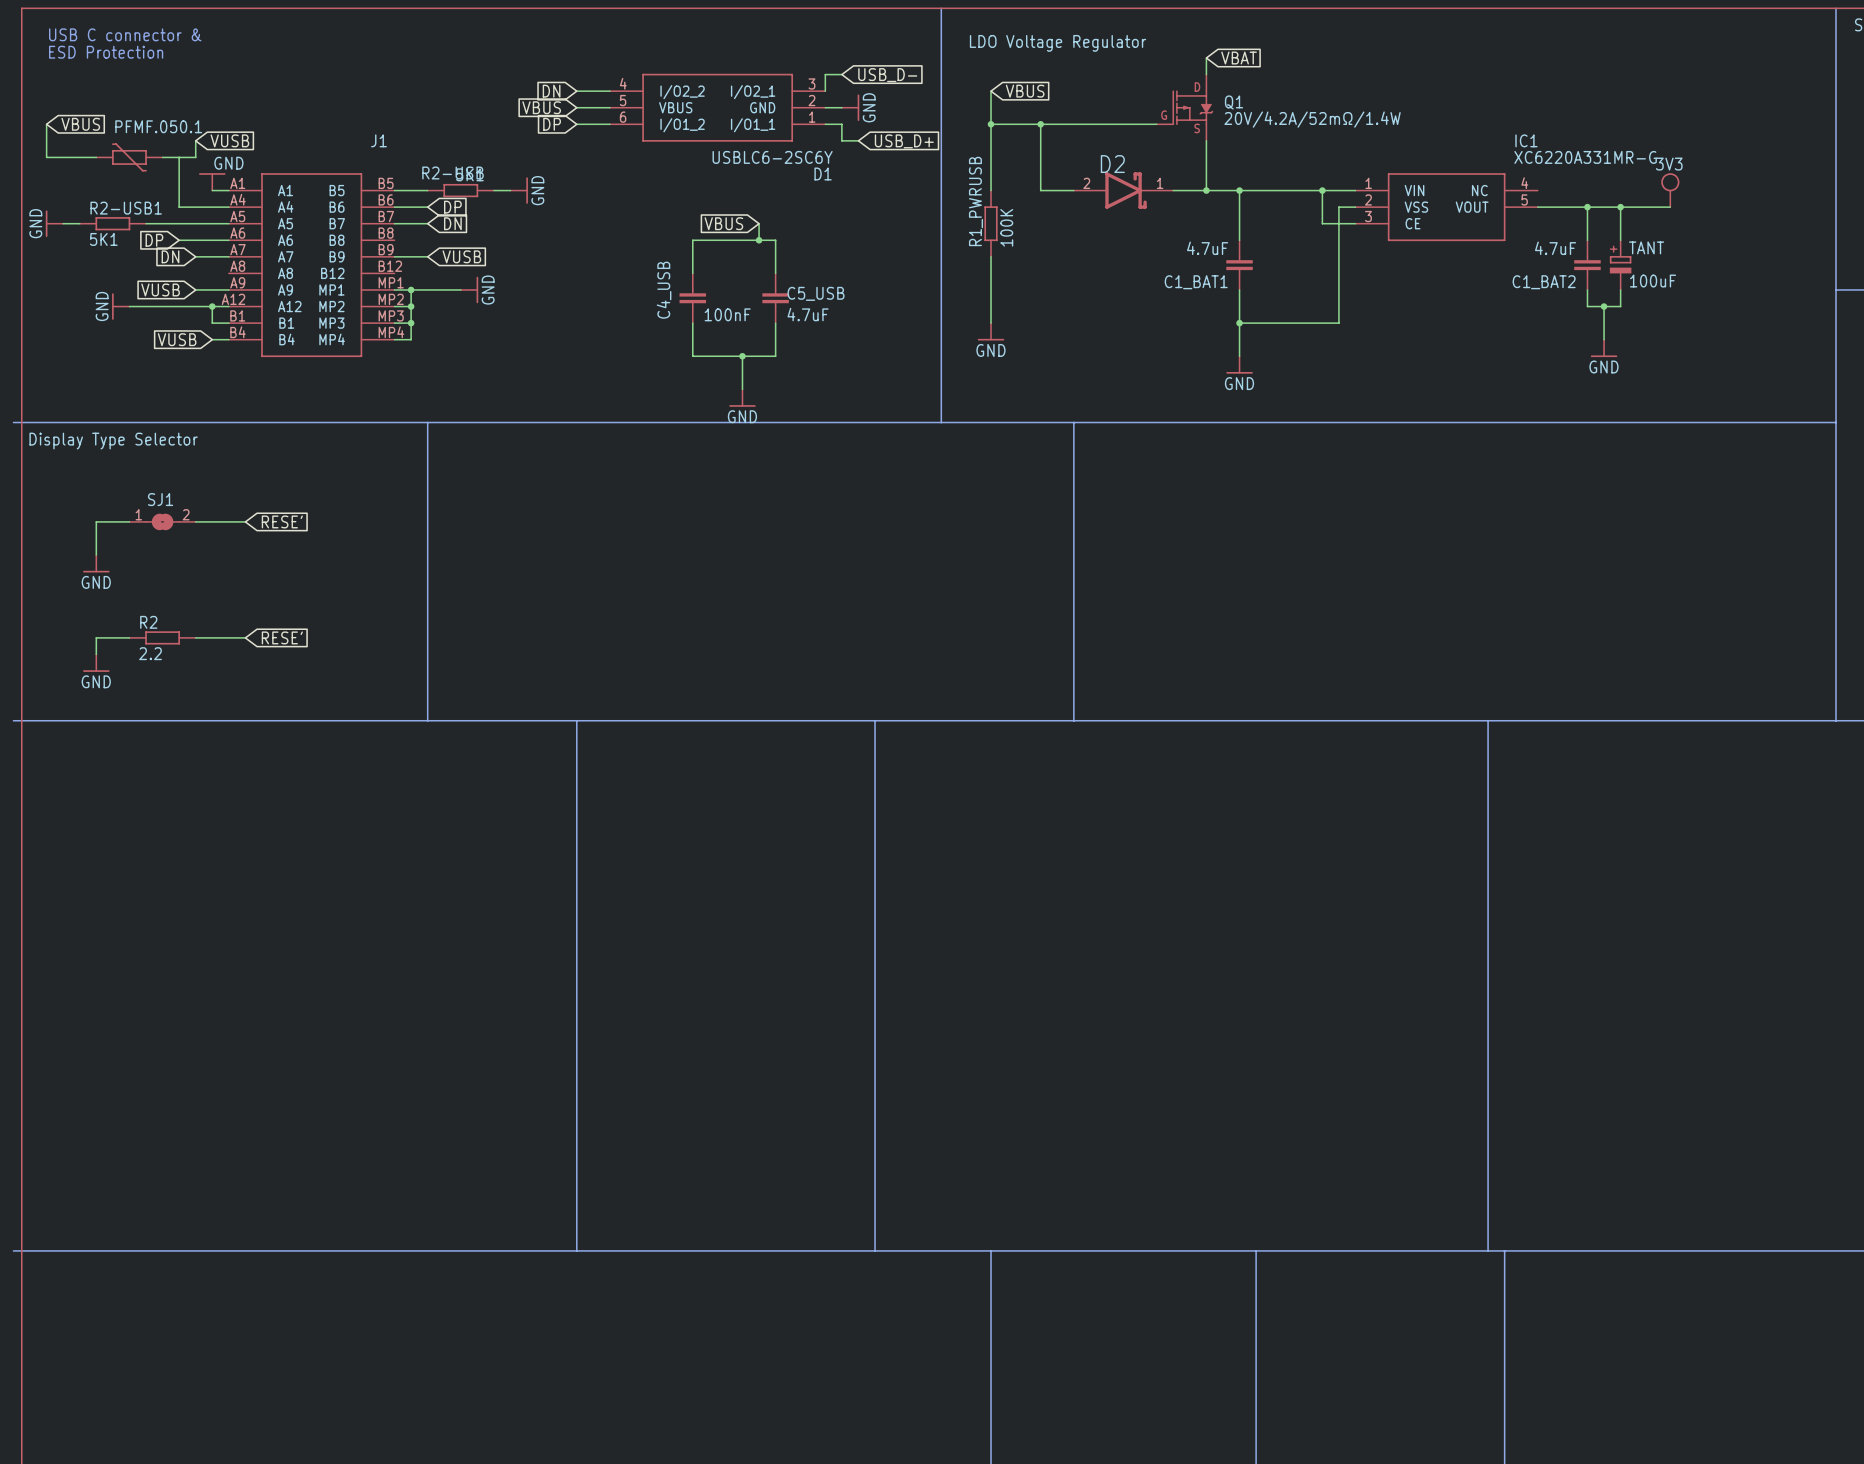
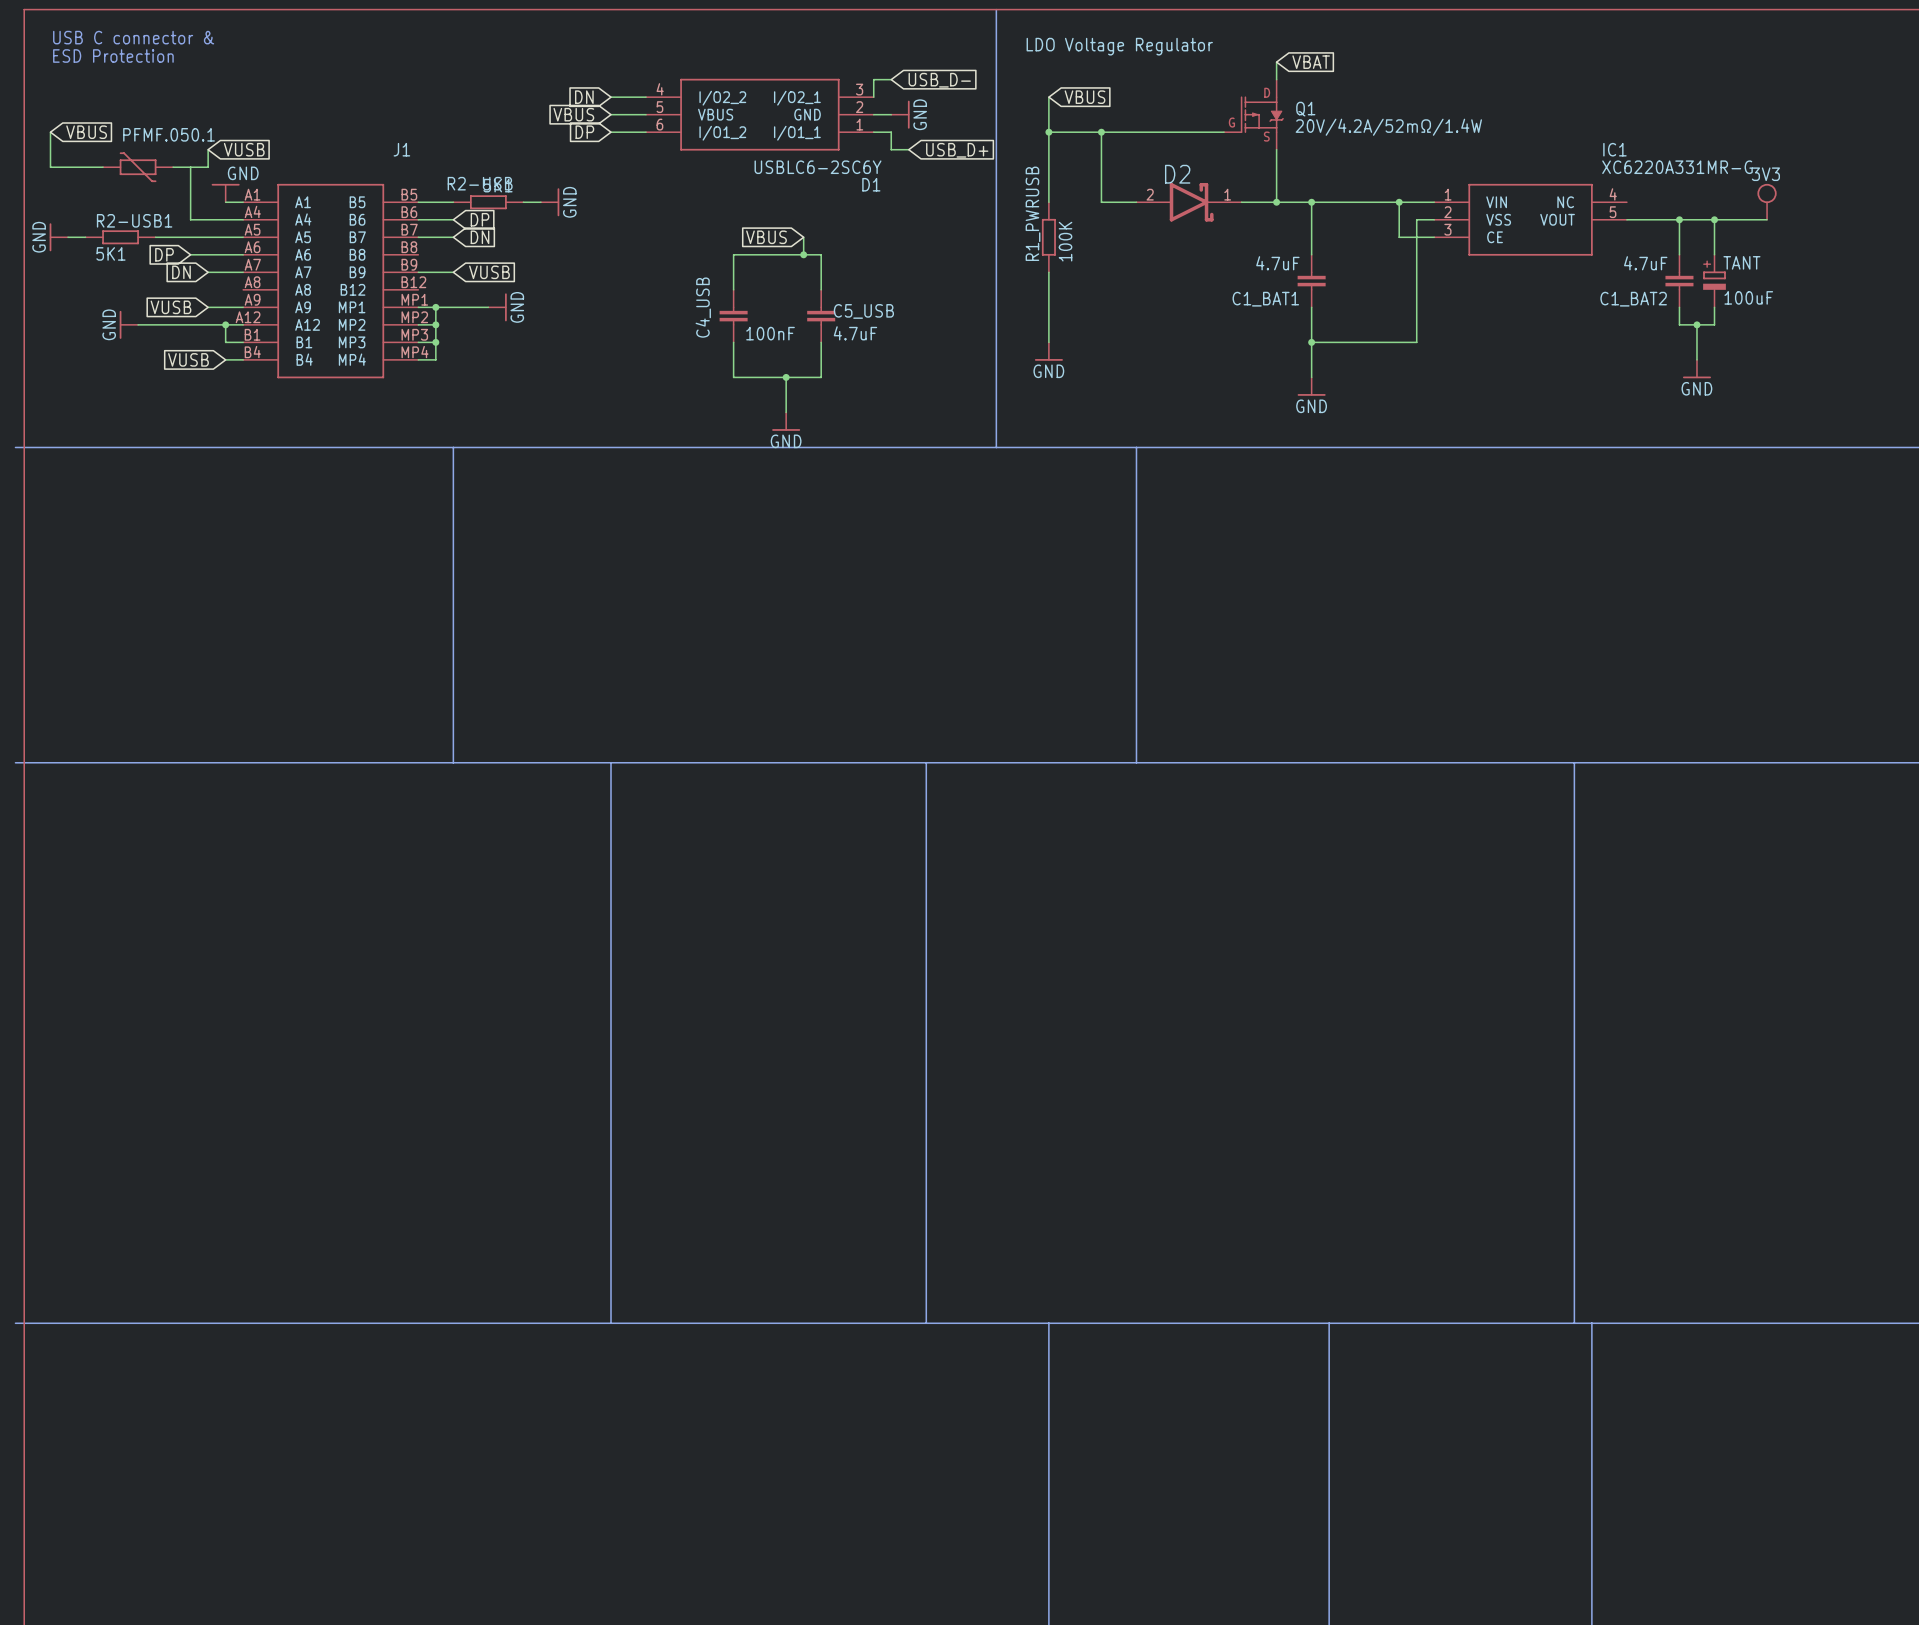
text: Display Type Selector (113, 441) -> none
wire: (129, 521) (96, 521) (96, 555) -> none
SJ1: (162, 521) -> none
wire: (195, 521) (245, 521) -> none
global label: RESE' (282, 521) -> none
power symbol: GND (96, 563) -> none
wire: (129, 637) (96, 637) (96, 654) -> none
R2: 2.2 (162, 637) -> none
wire: (195, 637) (245, 637) -> none
global label: RESE' (282, 637) -> none
power symbol: GND (96, 663) -> none

